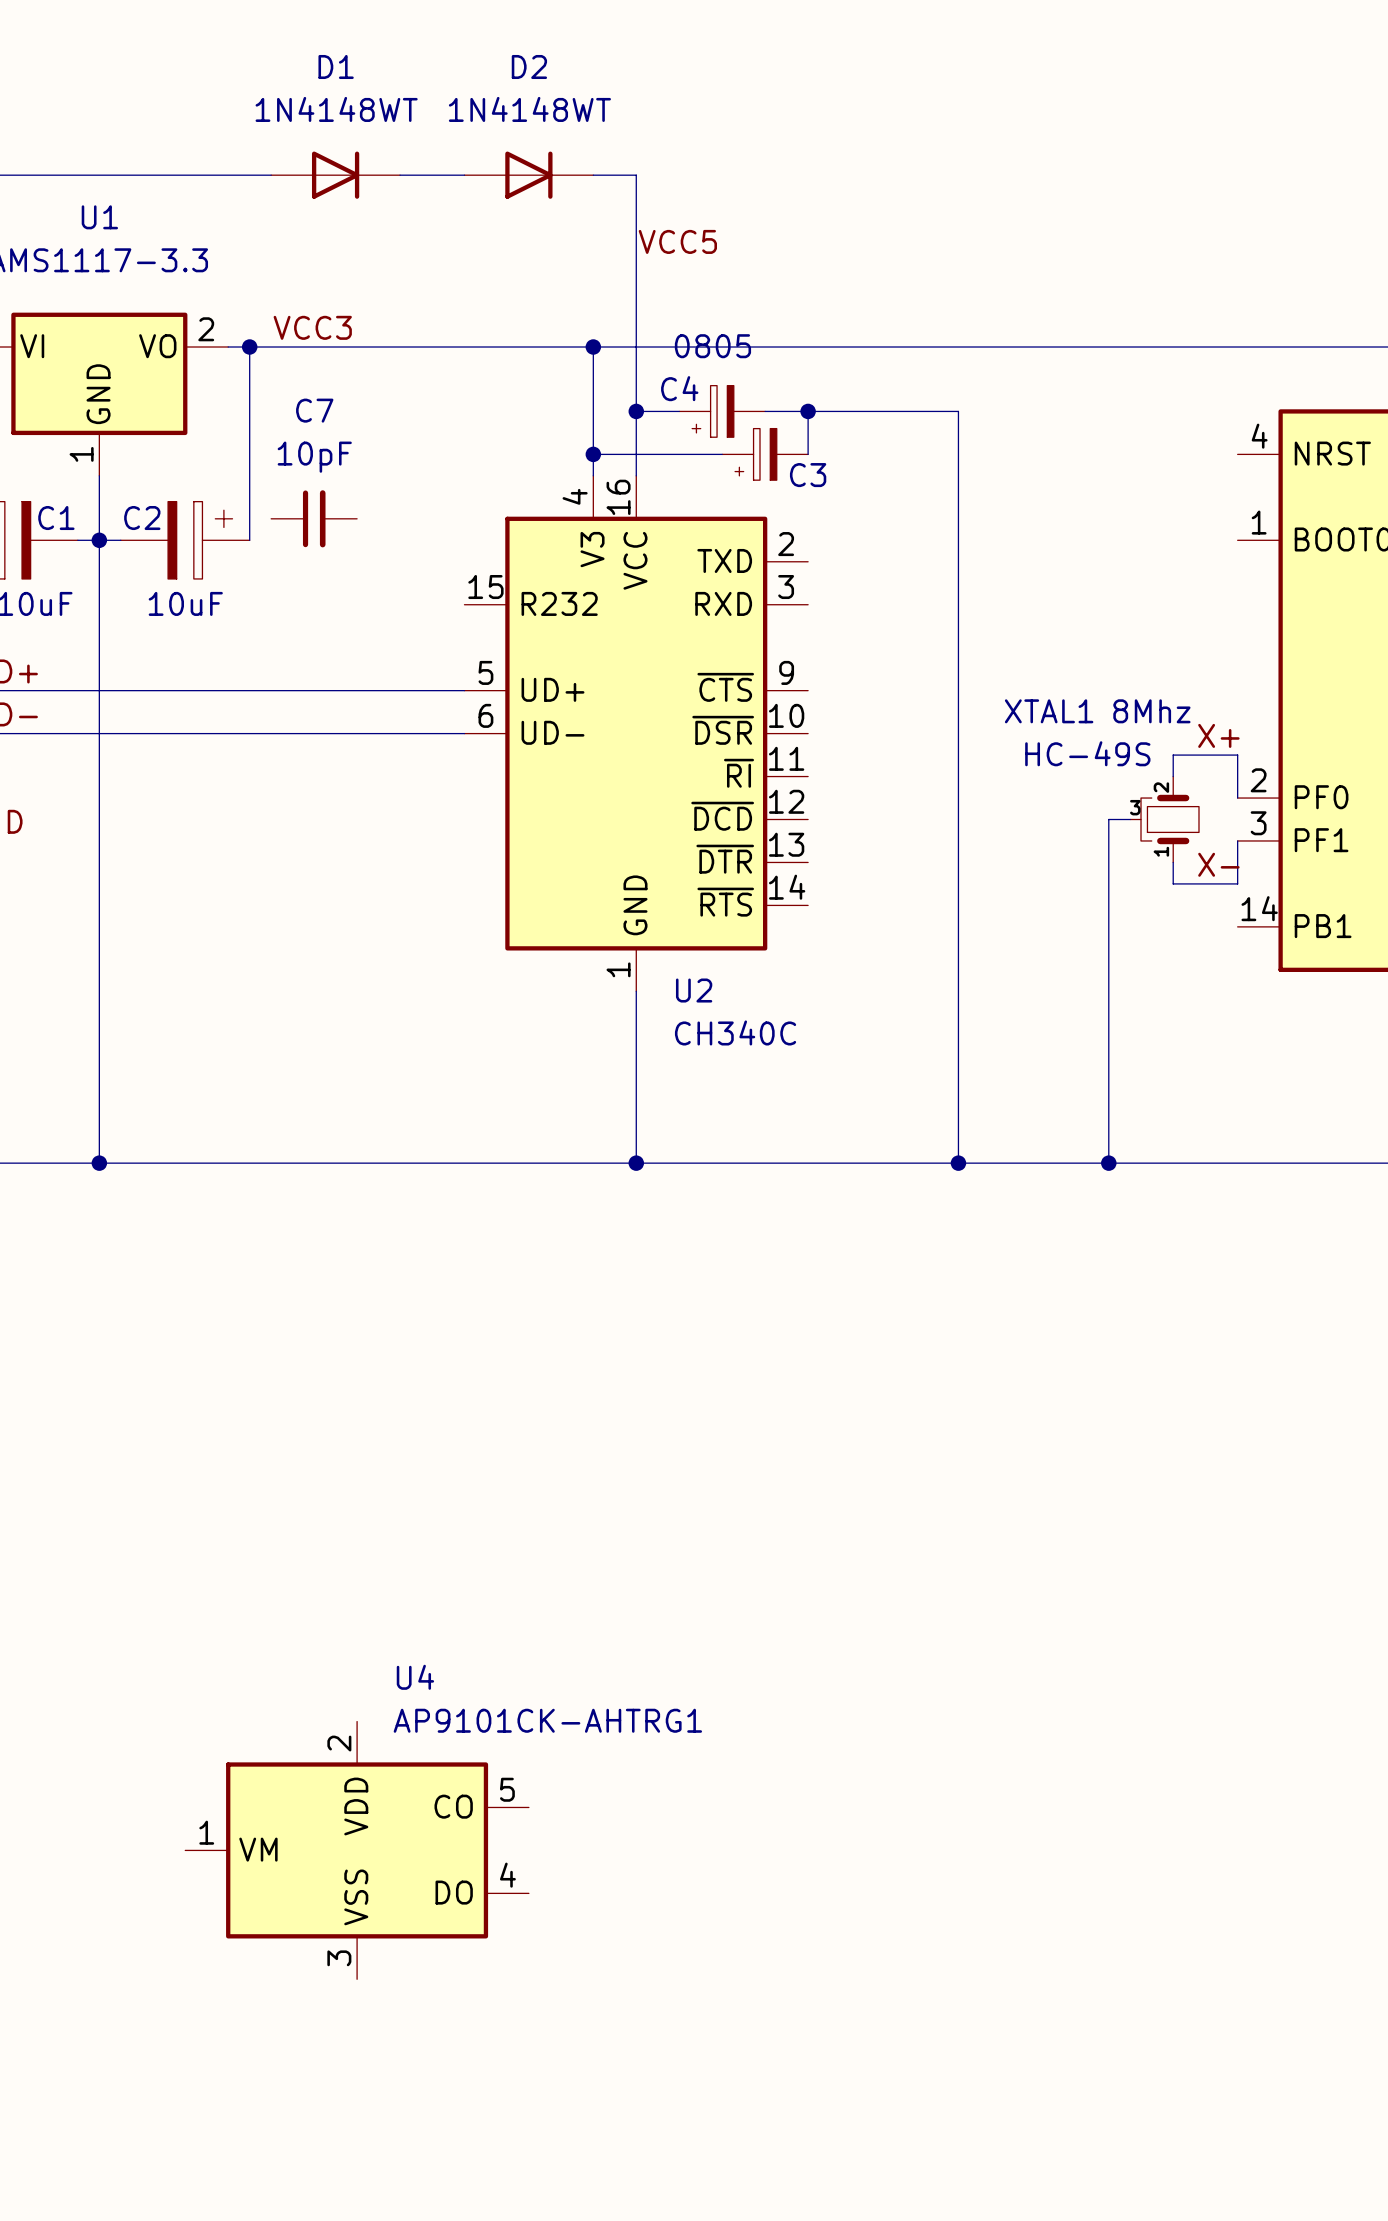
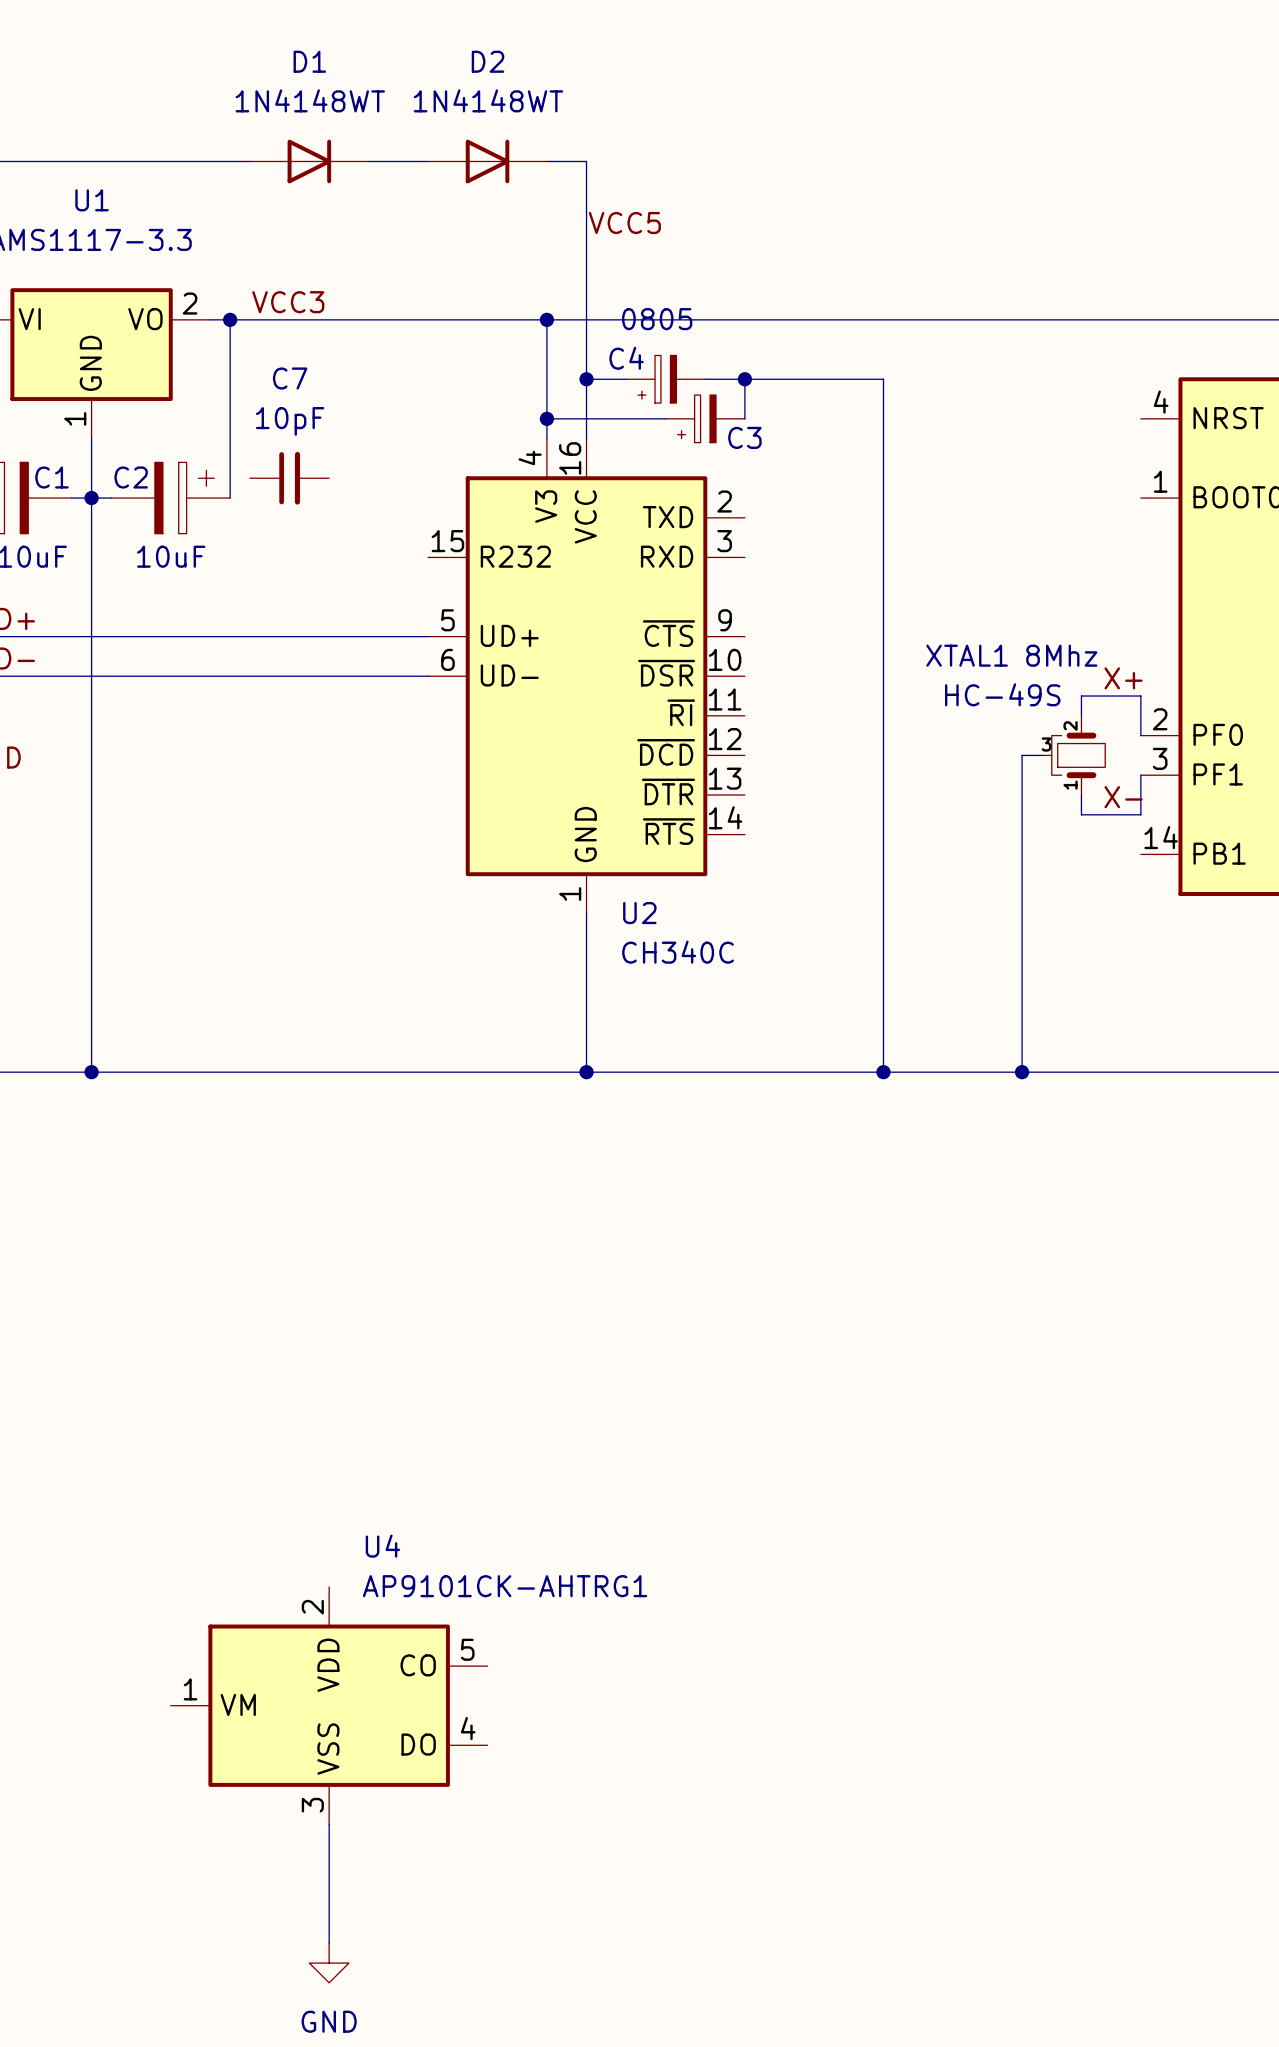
wire: none -> (329, 1824) (329, 1943)
power symbol: none -> GND (329, 1963)

